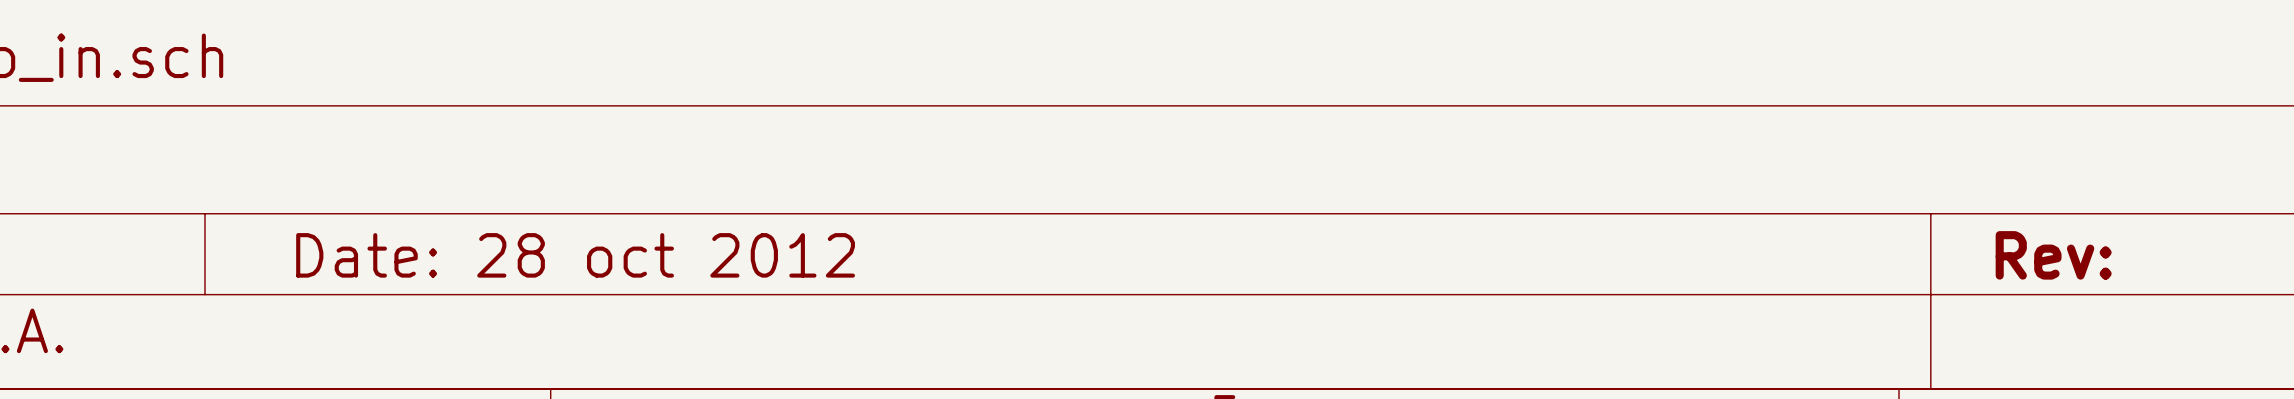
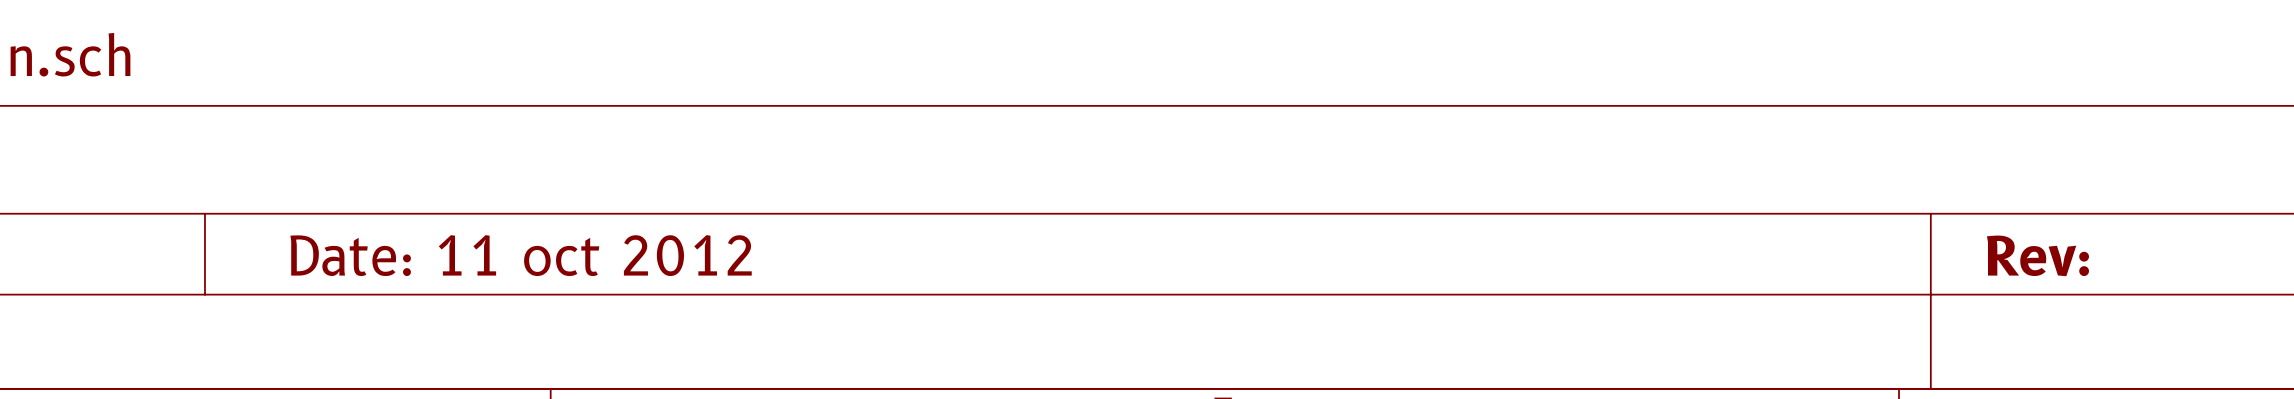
title block: Date: 28 oct 2012 (575, 255) -> Date: 11 oct 2012 (521, 255)

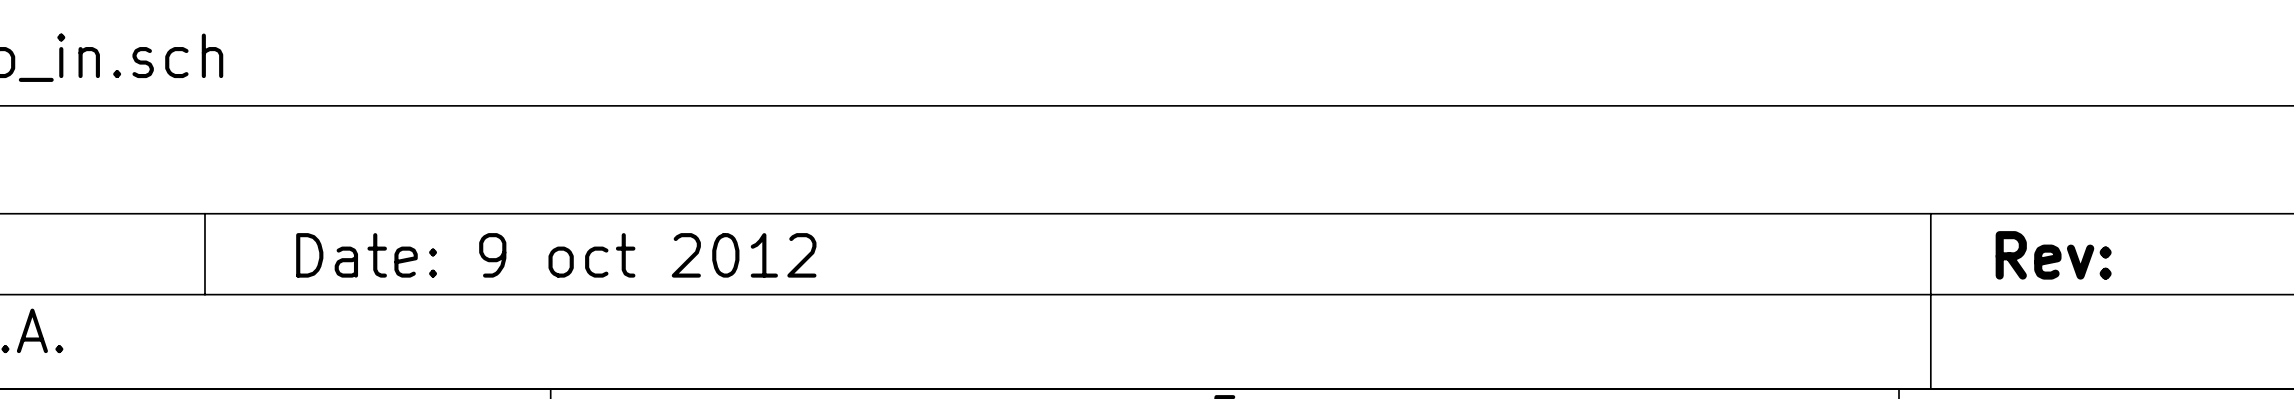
title block: Date: 11 oct 2012 (521, 255) -> Date: 9 oct 2012 (556, 255)

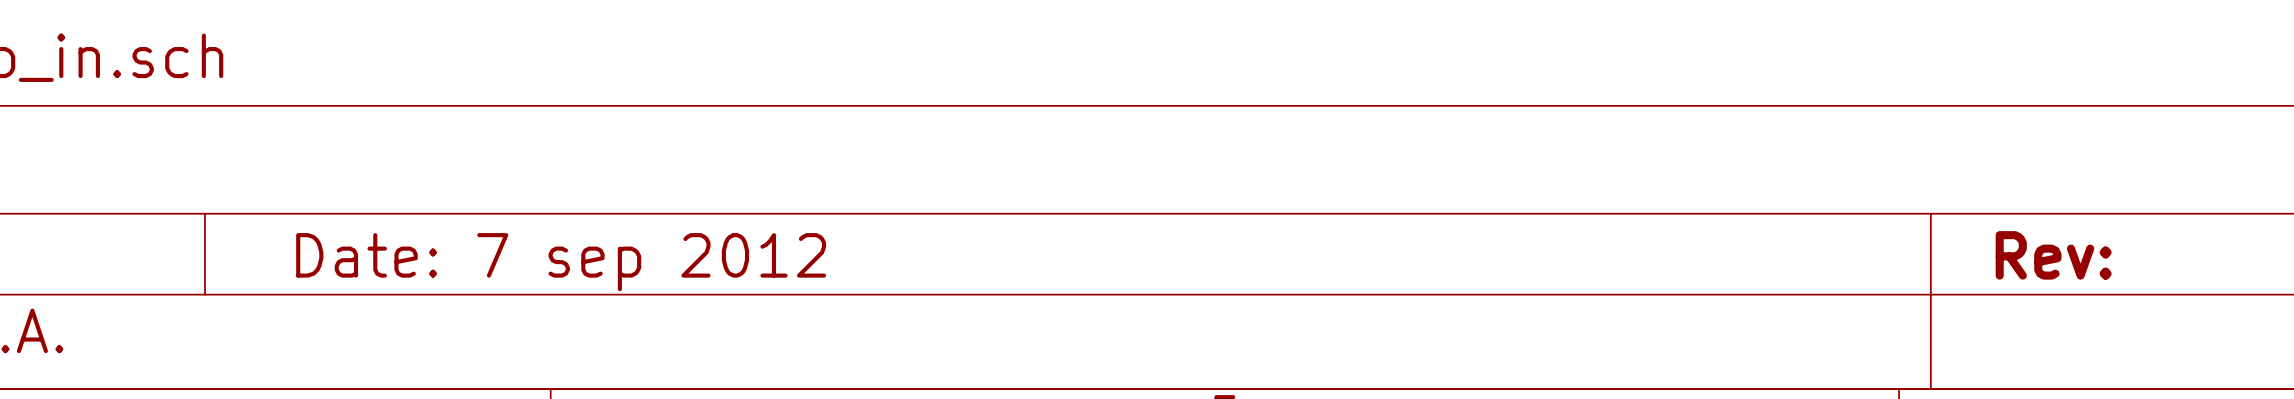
title block: Date: 9 oct 2012 (556, 255) -> Date: 7 sep 2012 (561, 262)

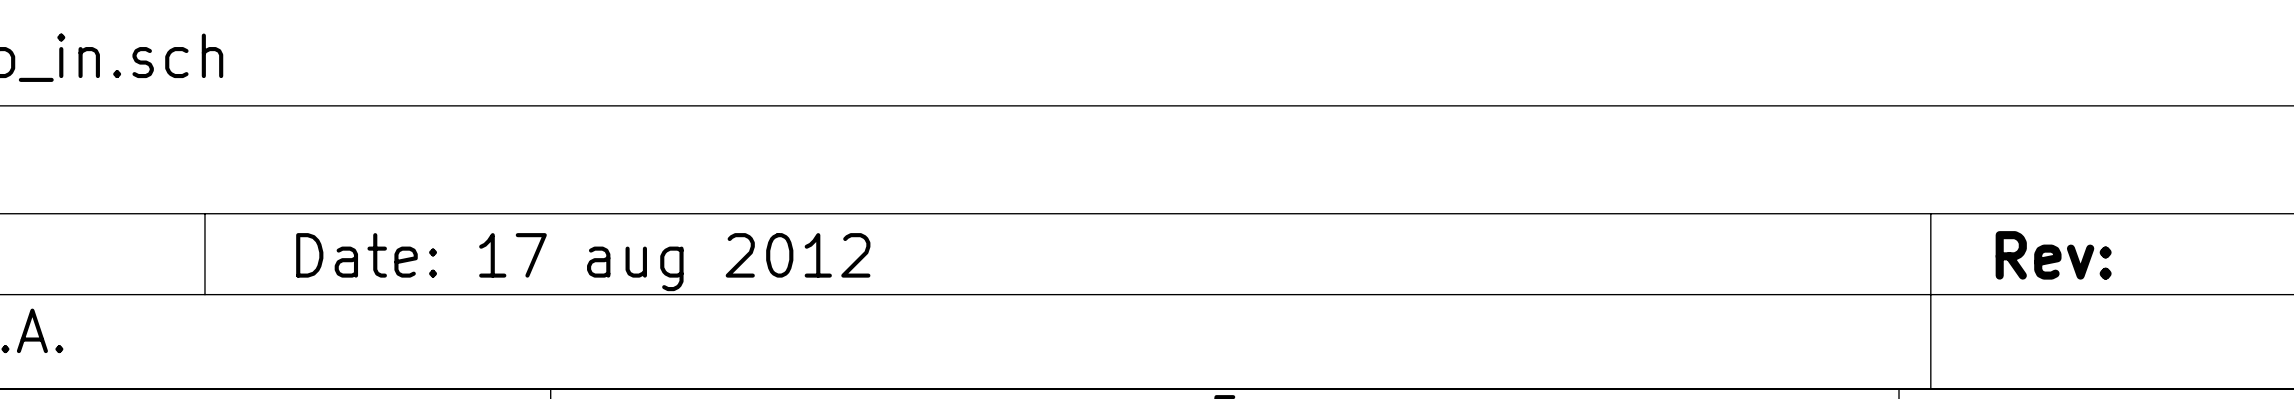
title block: Date: 7 sep 2012 (561, 262) -> Date: 17 aug 2012 (583, 262)

